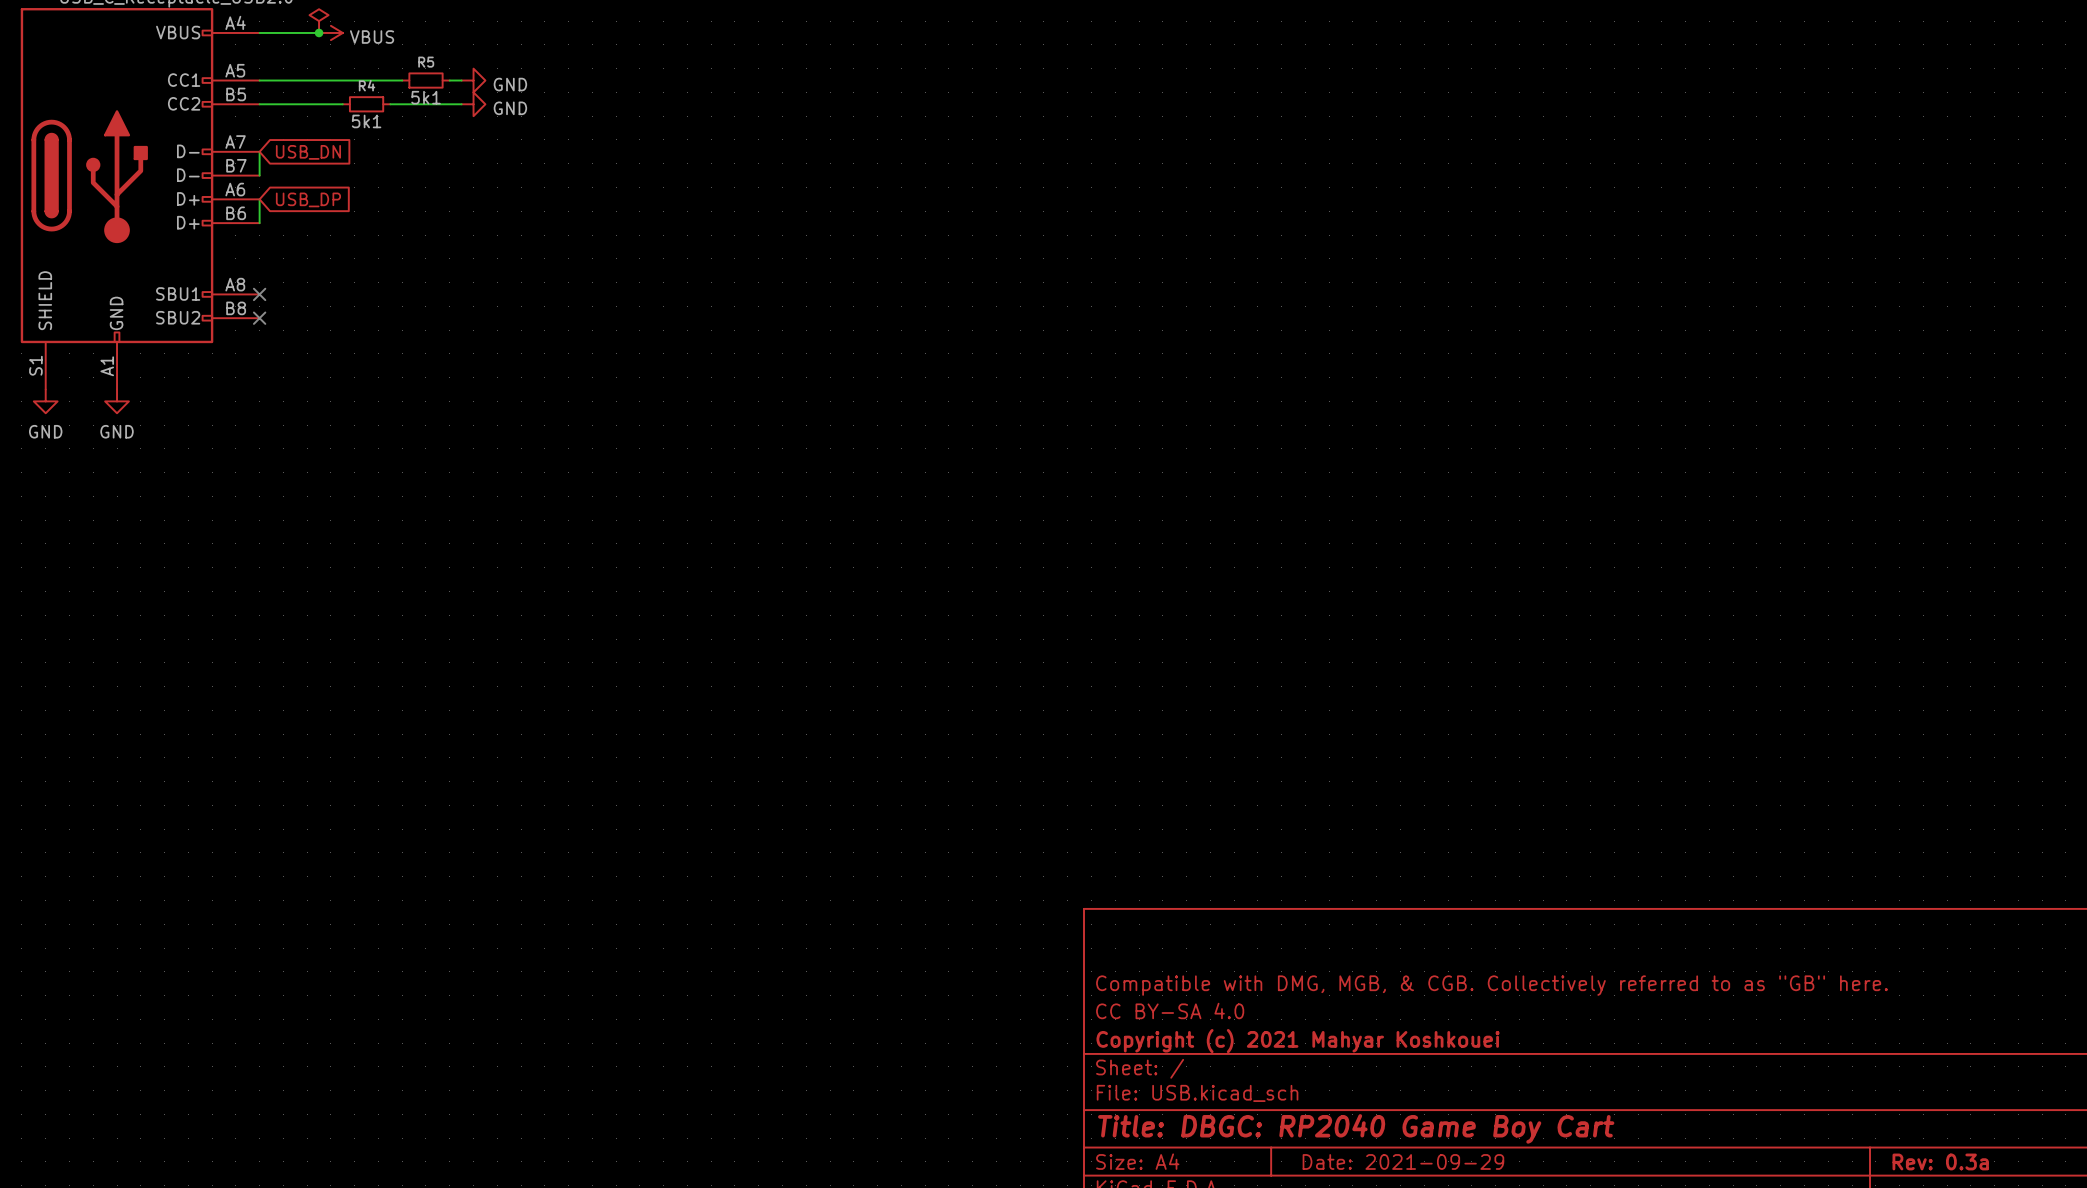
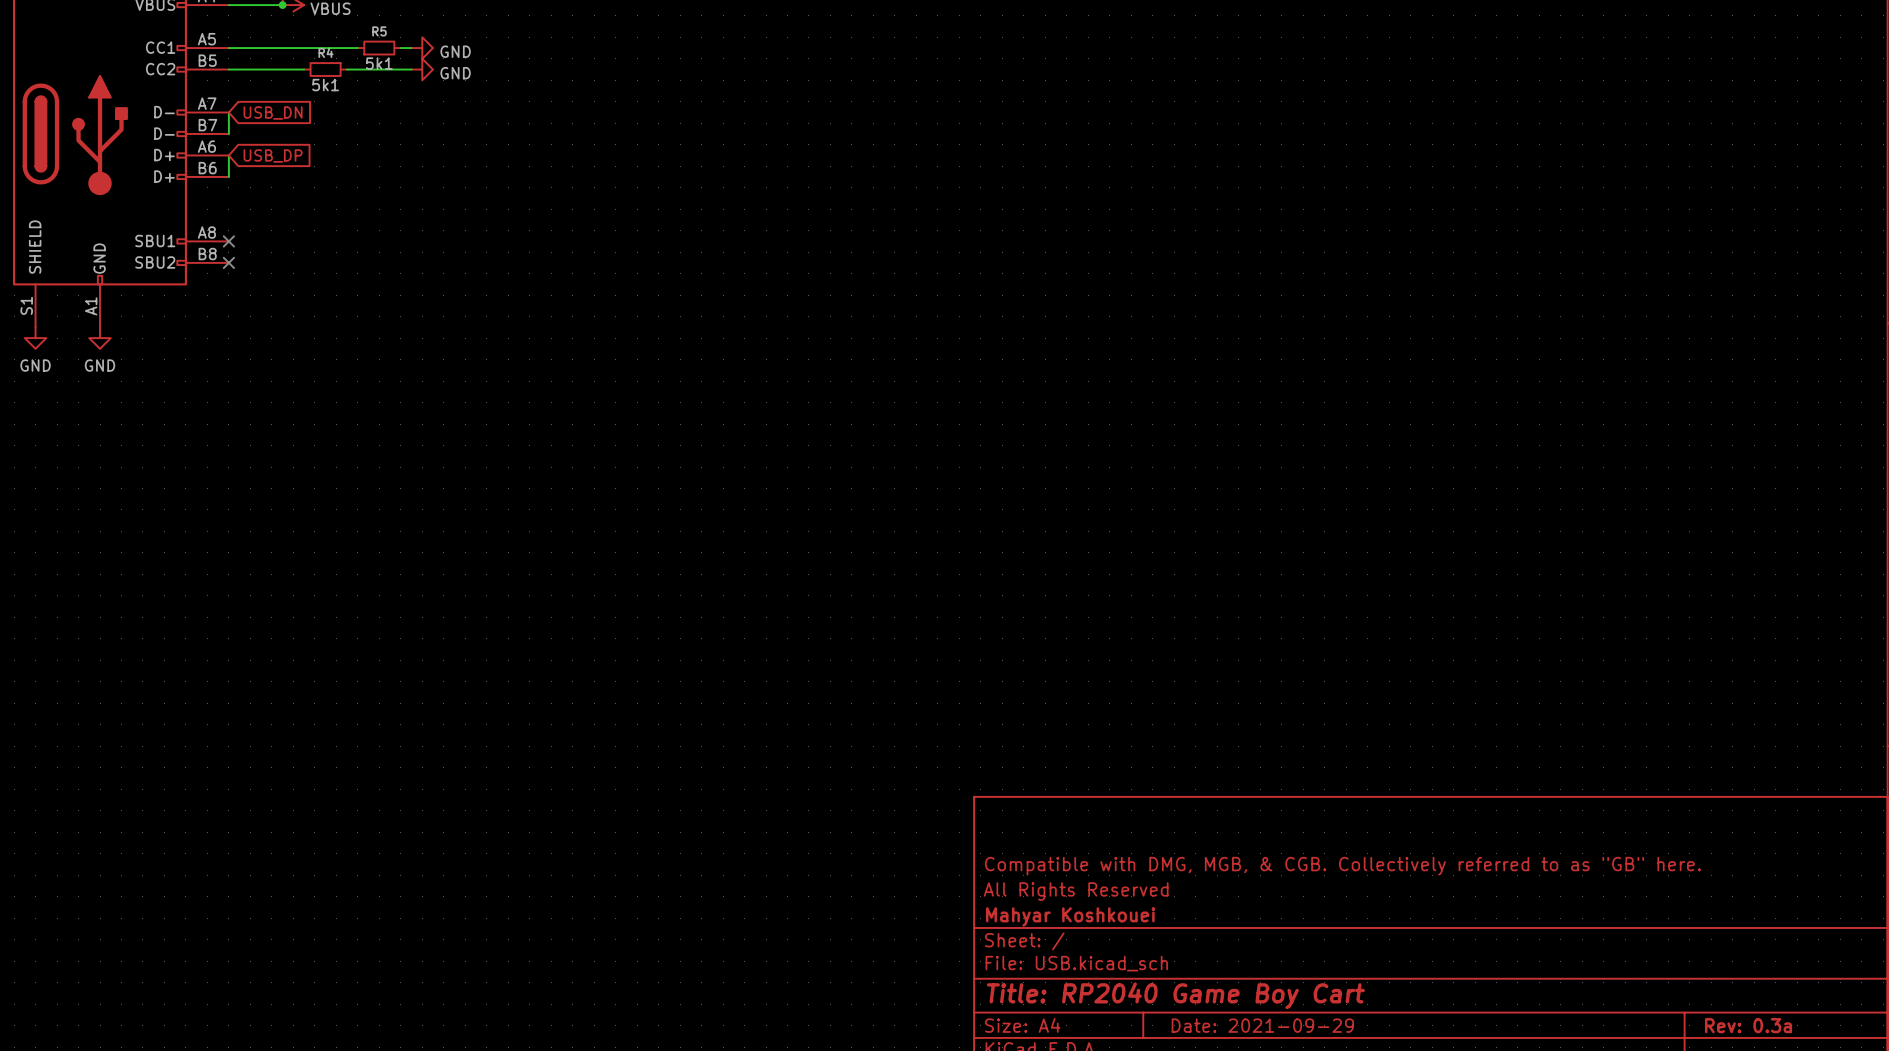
title block: CC BY-SA 4.0 (1170, 1010) -> All Rights Reserved (1076, 891)
title block: Copyright (c) 2021 Mahyar Koshkouei (1298, 1041) -> Mahyar Koshkouei (1070, 916)
title block: Title: DBGC: RP2040 Game Boy Cart (1356, 1128) -> Title: RP2040 Game Boy Cart (1175, 995)

